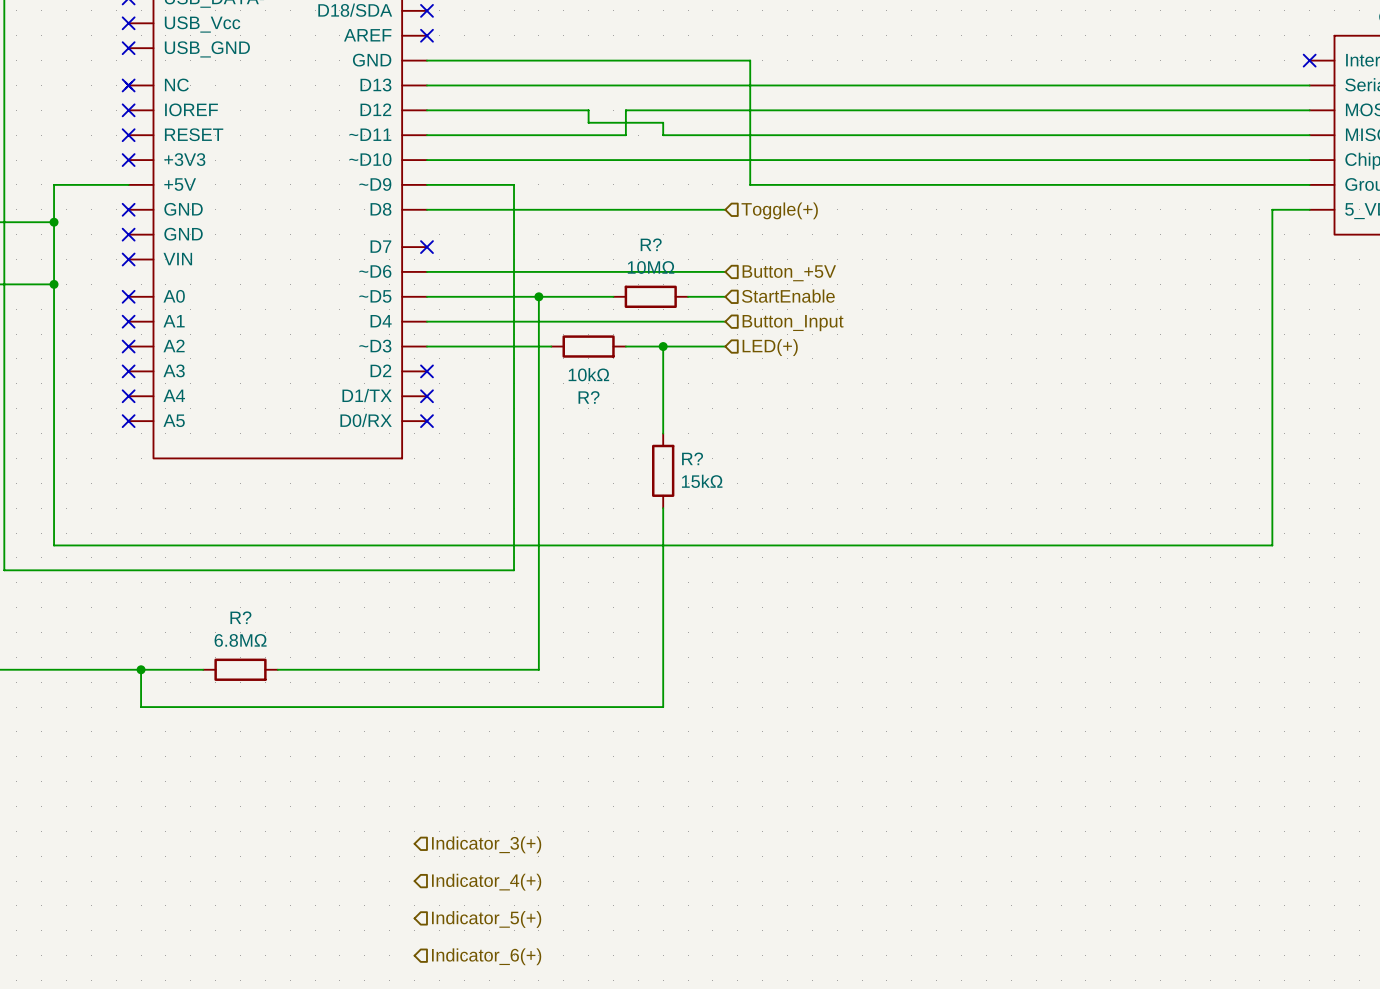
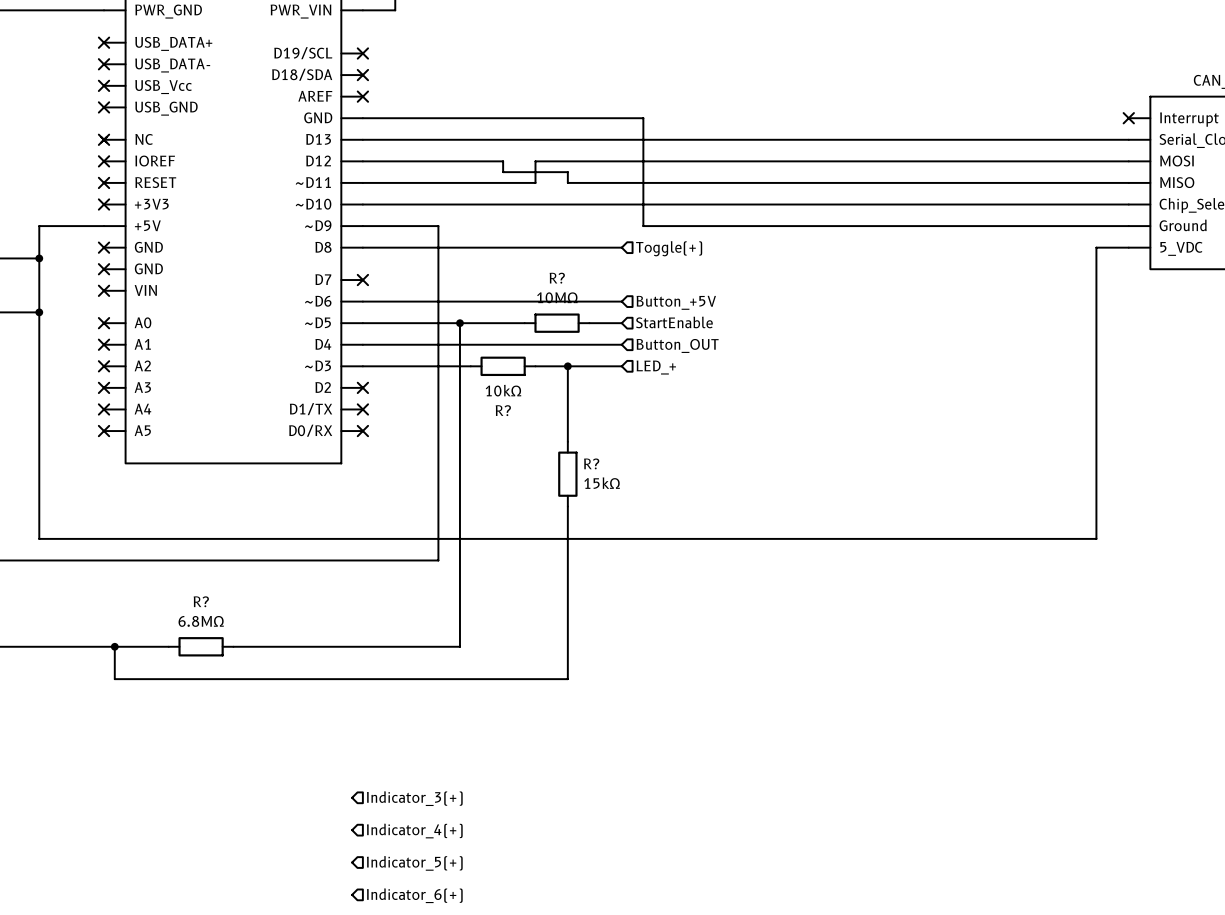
hierarchical label: Button_Input (793, 323) -> Button_OUT (677, 345)
hierarchical label: LED(+) (770, 347) -> LED_+ (656, 367)

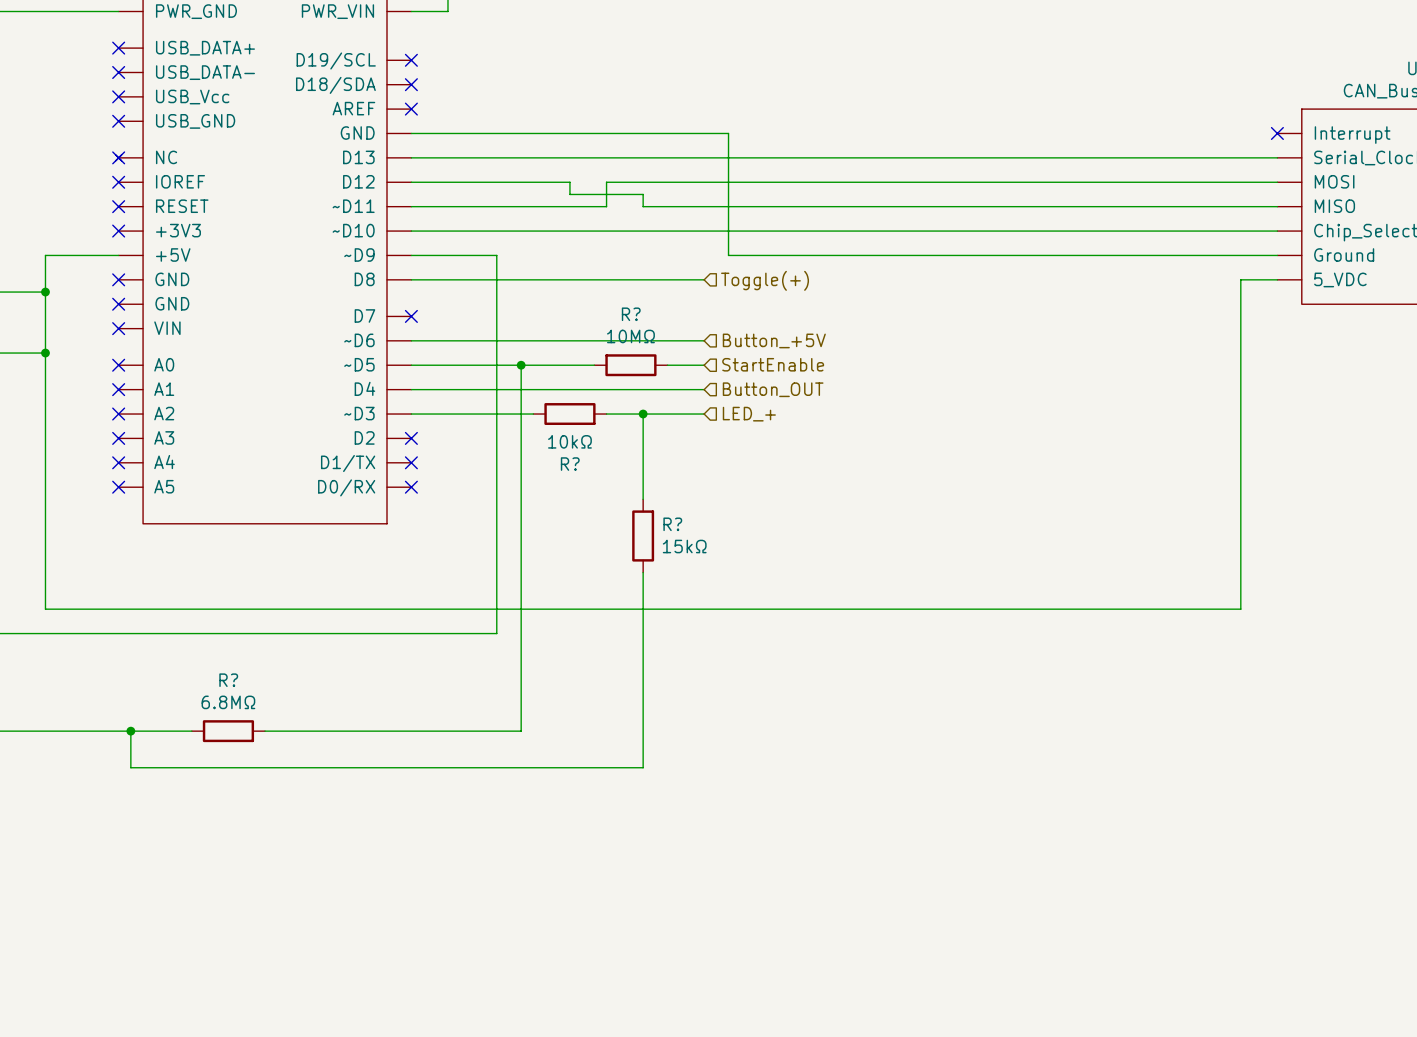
hierarchical label: Indicator_3(+) (414, 798) -> none
hierarchical label: Indicator_4(+) (414, 831) -> none
hierarchical label: Indicator_5(+) (414, 863) -> none
hierarchical label: Indicator_6(+) (414, 895) -> none

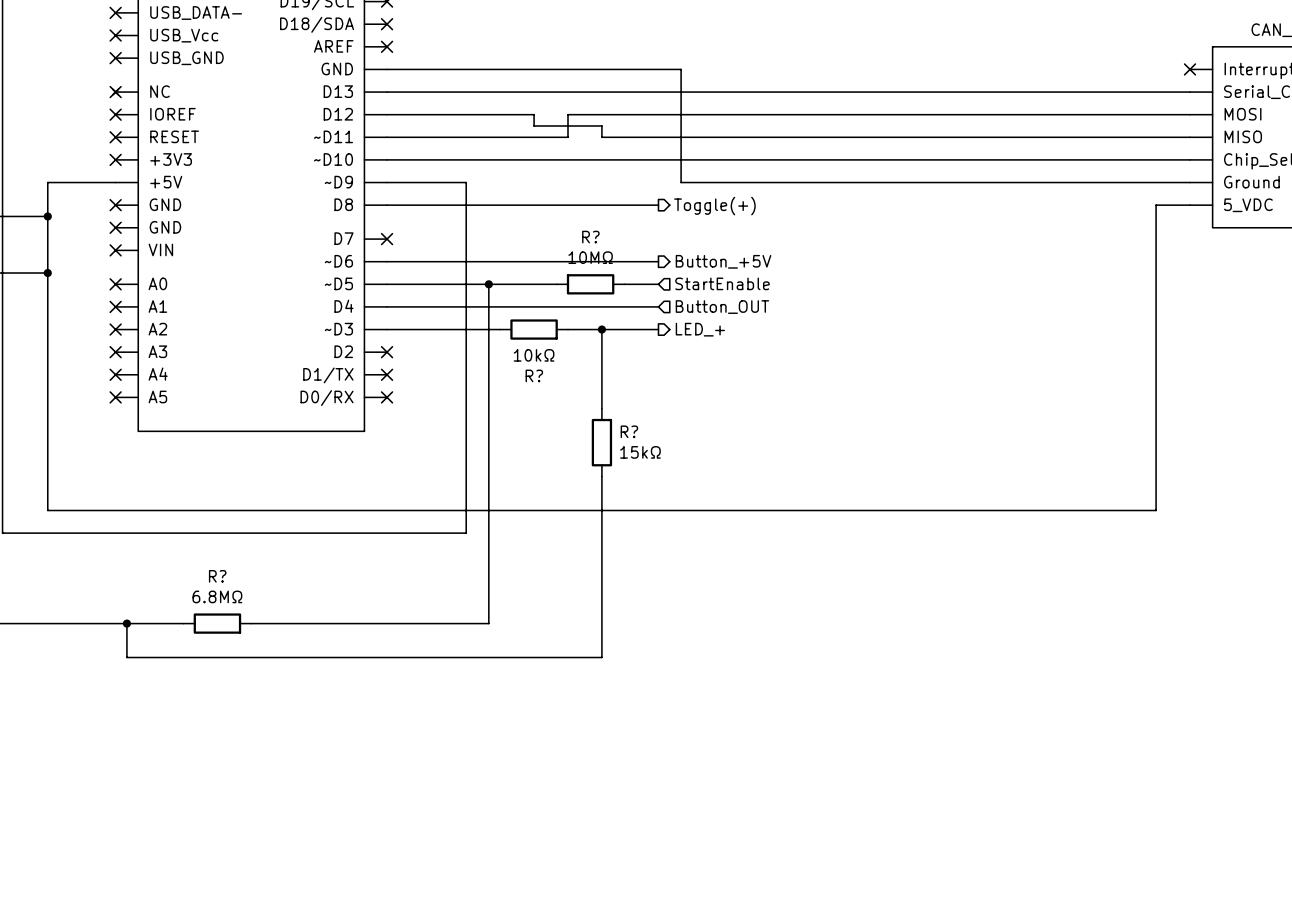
hierarchical label shape: input (765, 280) -> output (714, 206)
hierarchical label shape: input (774, 340) -> output (723, 261)
hierarchical label shape: input (749, 414) -> output (700, 329)

